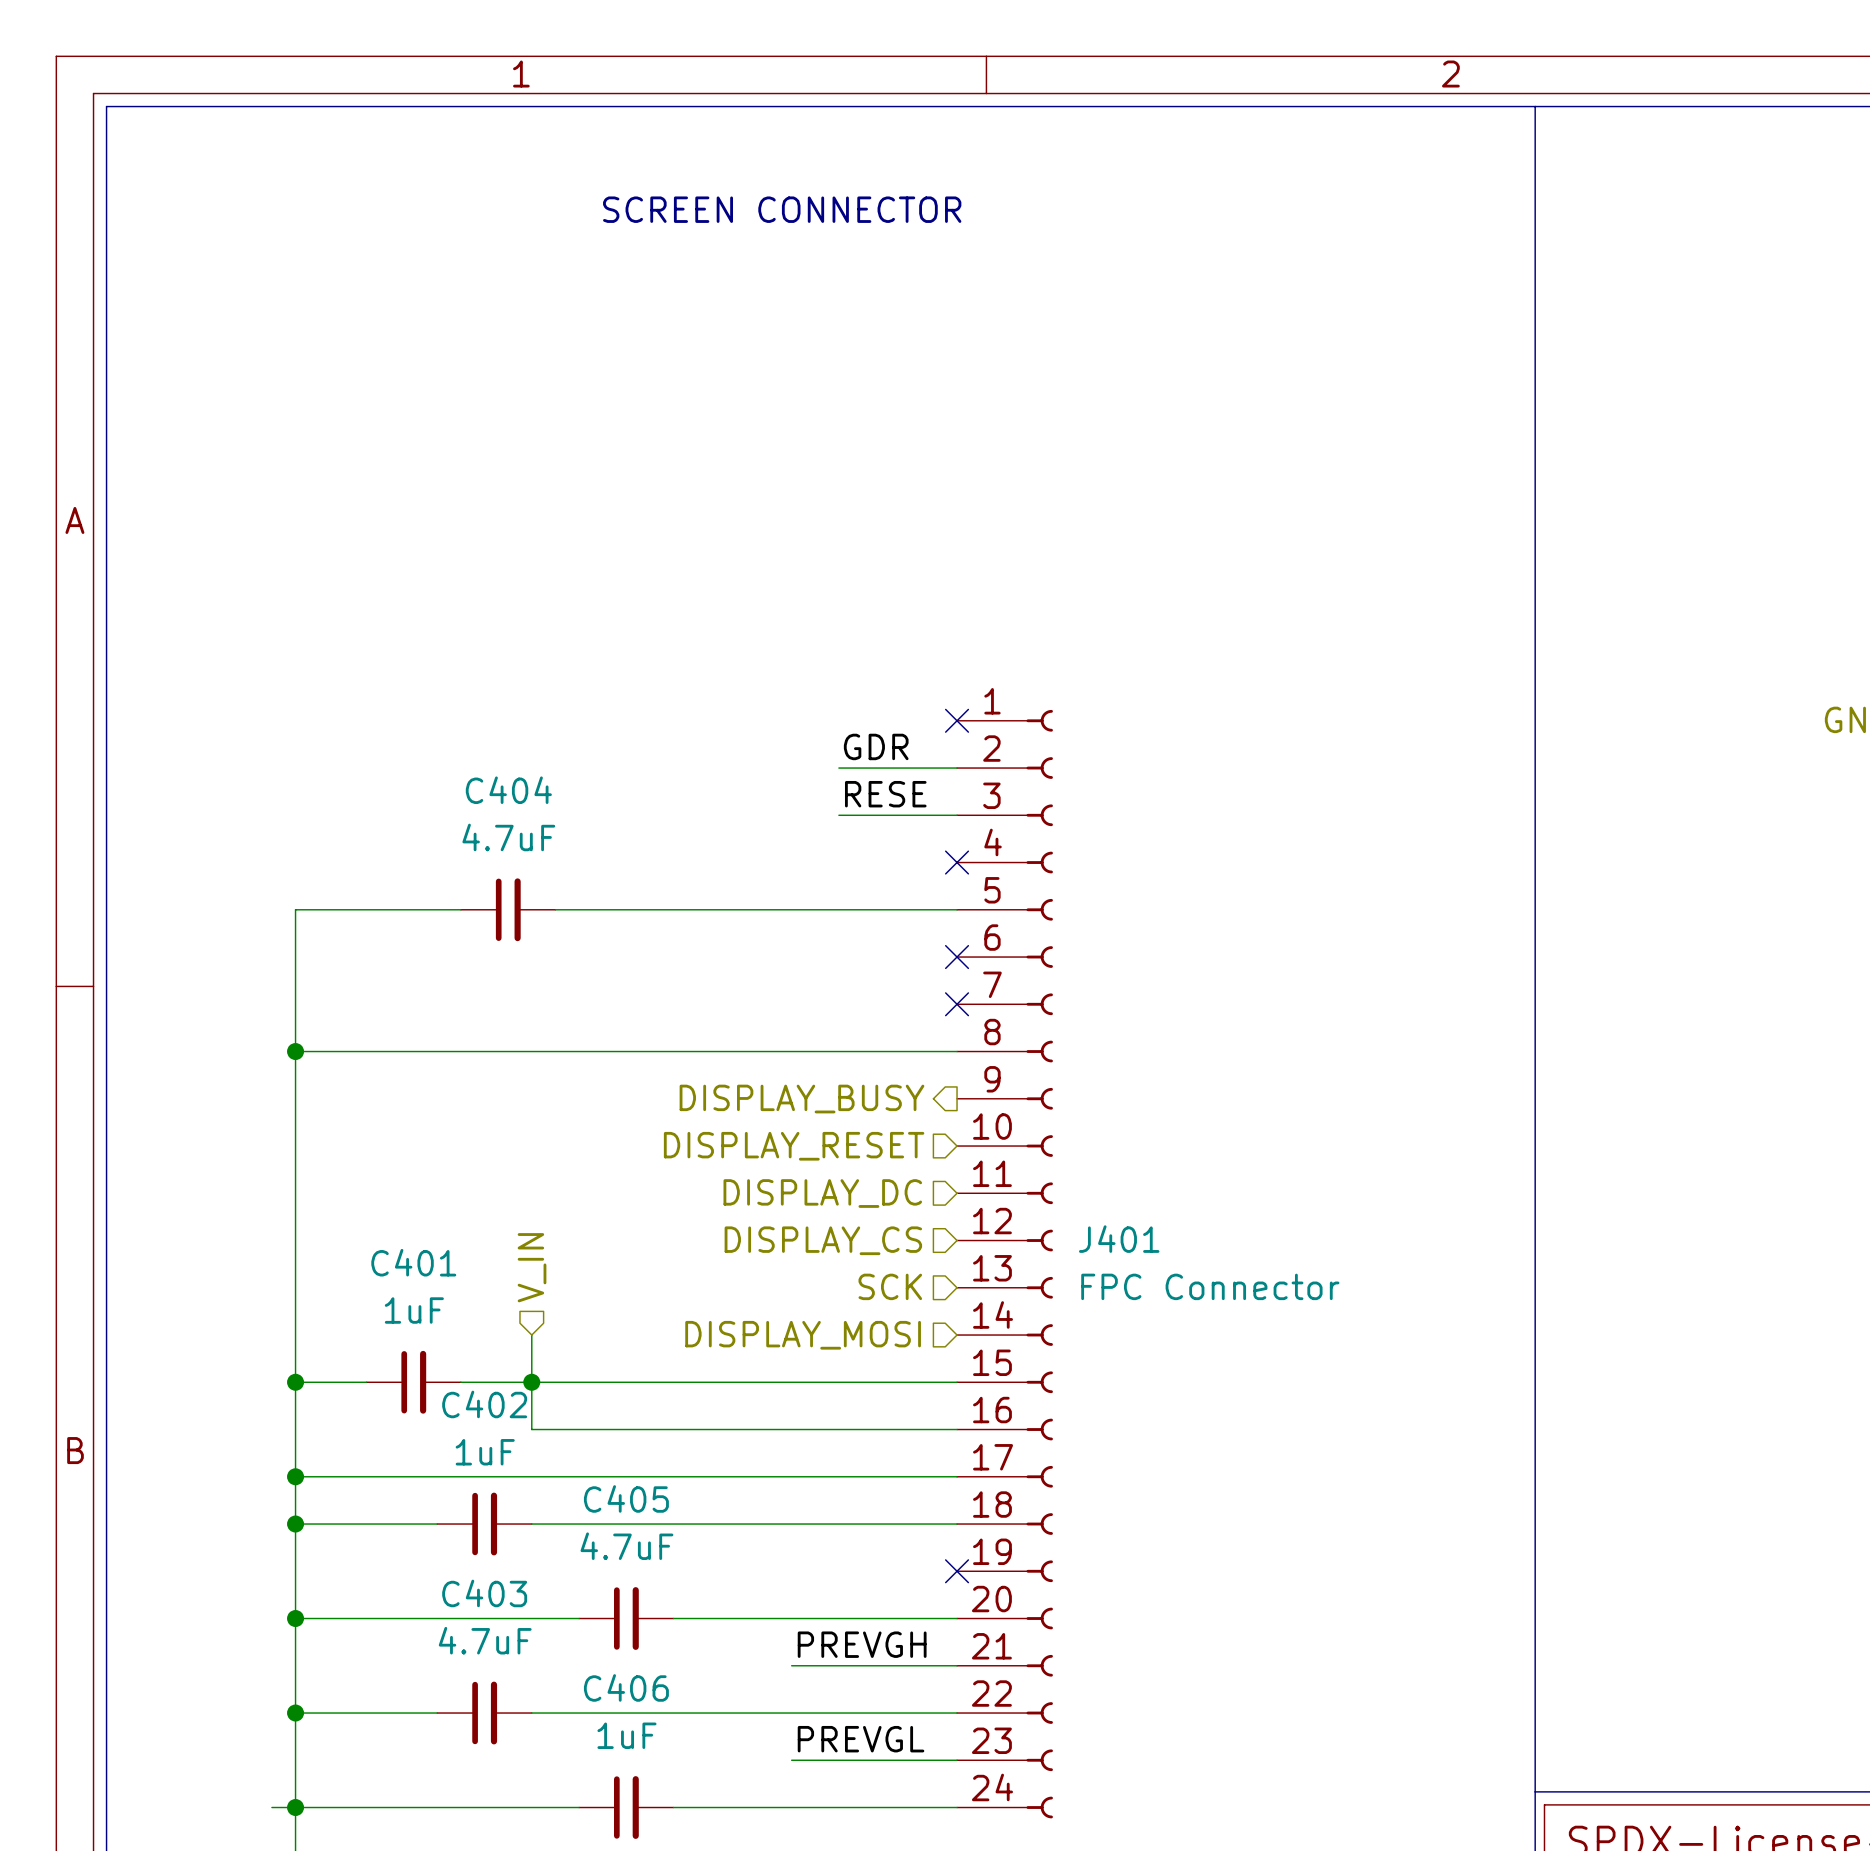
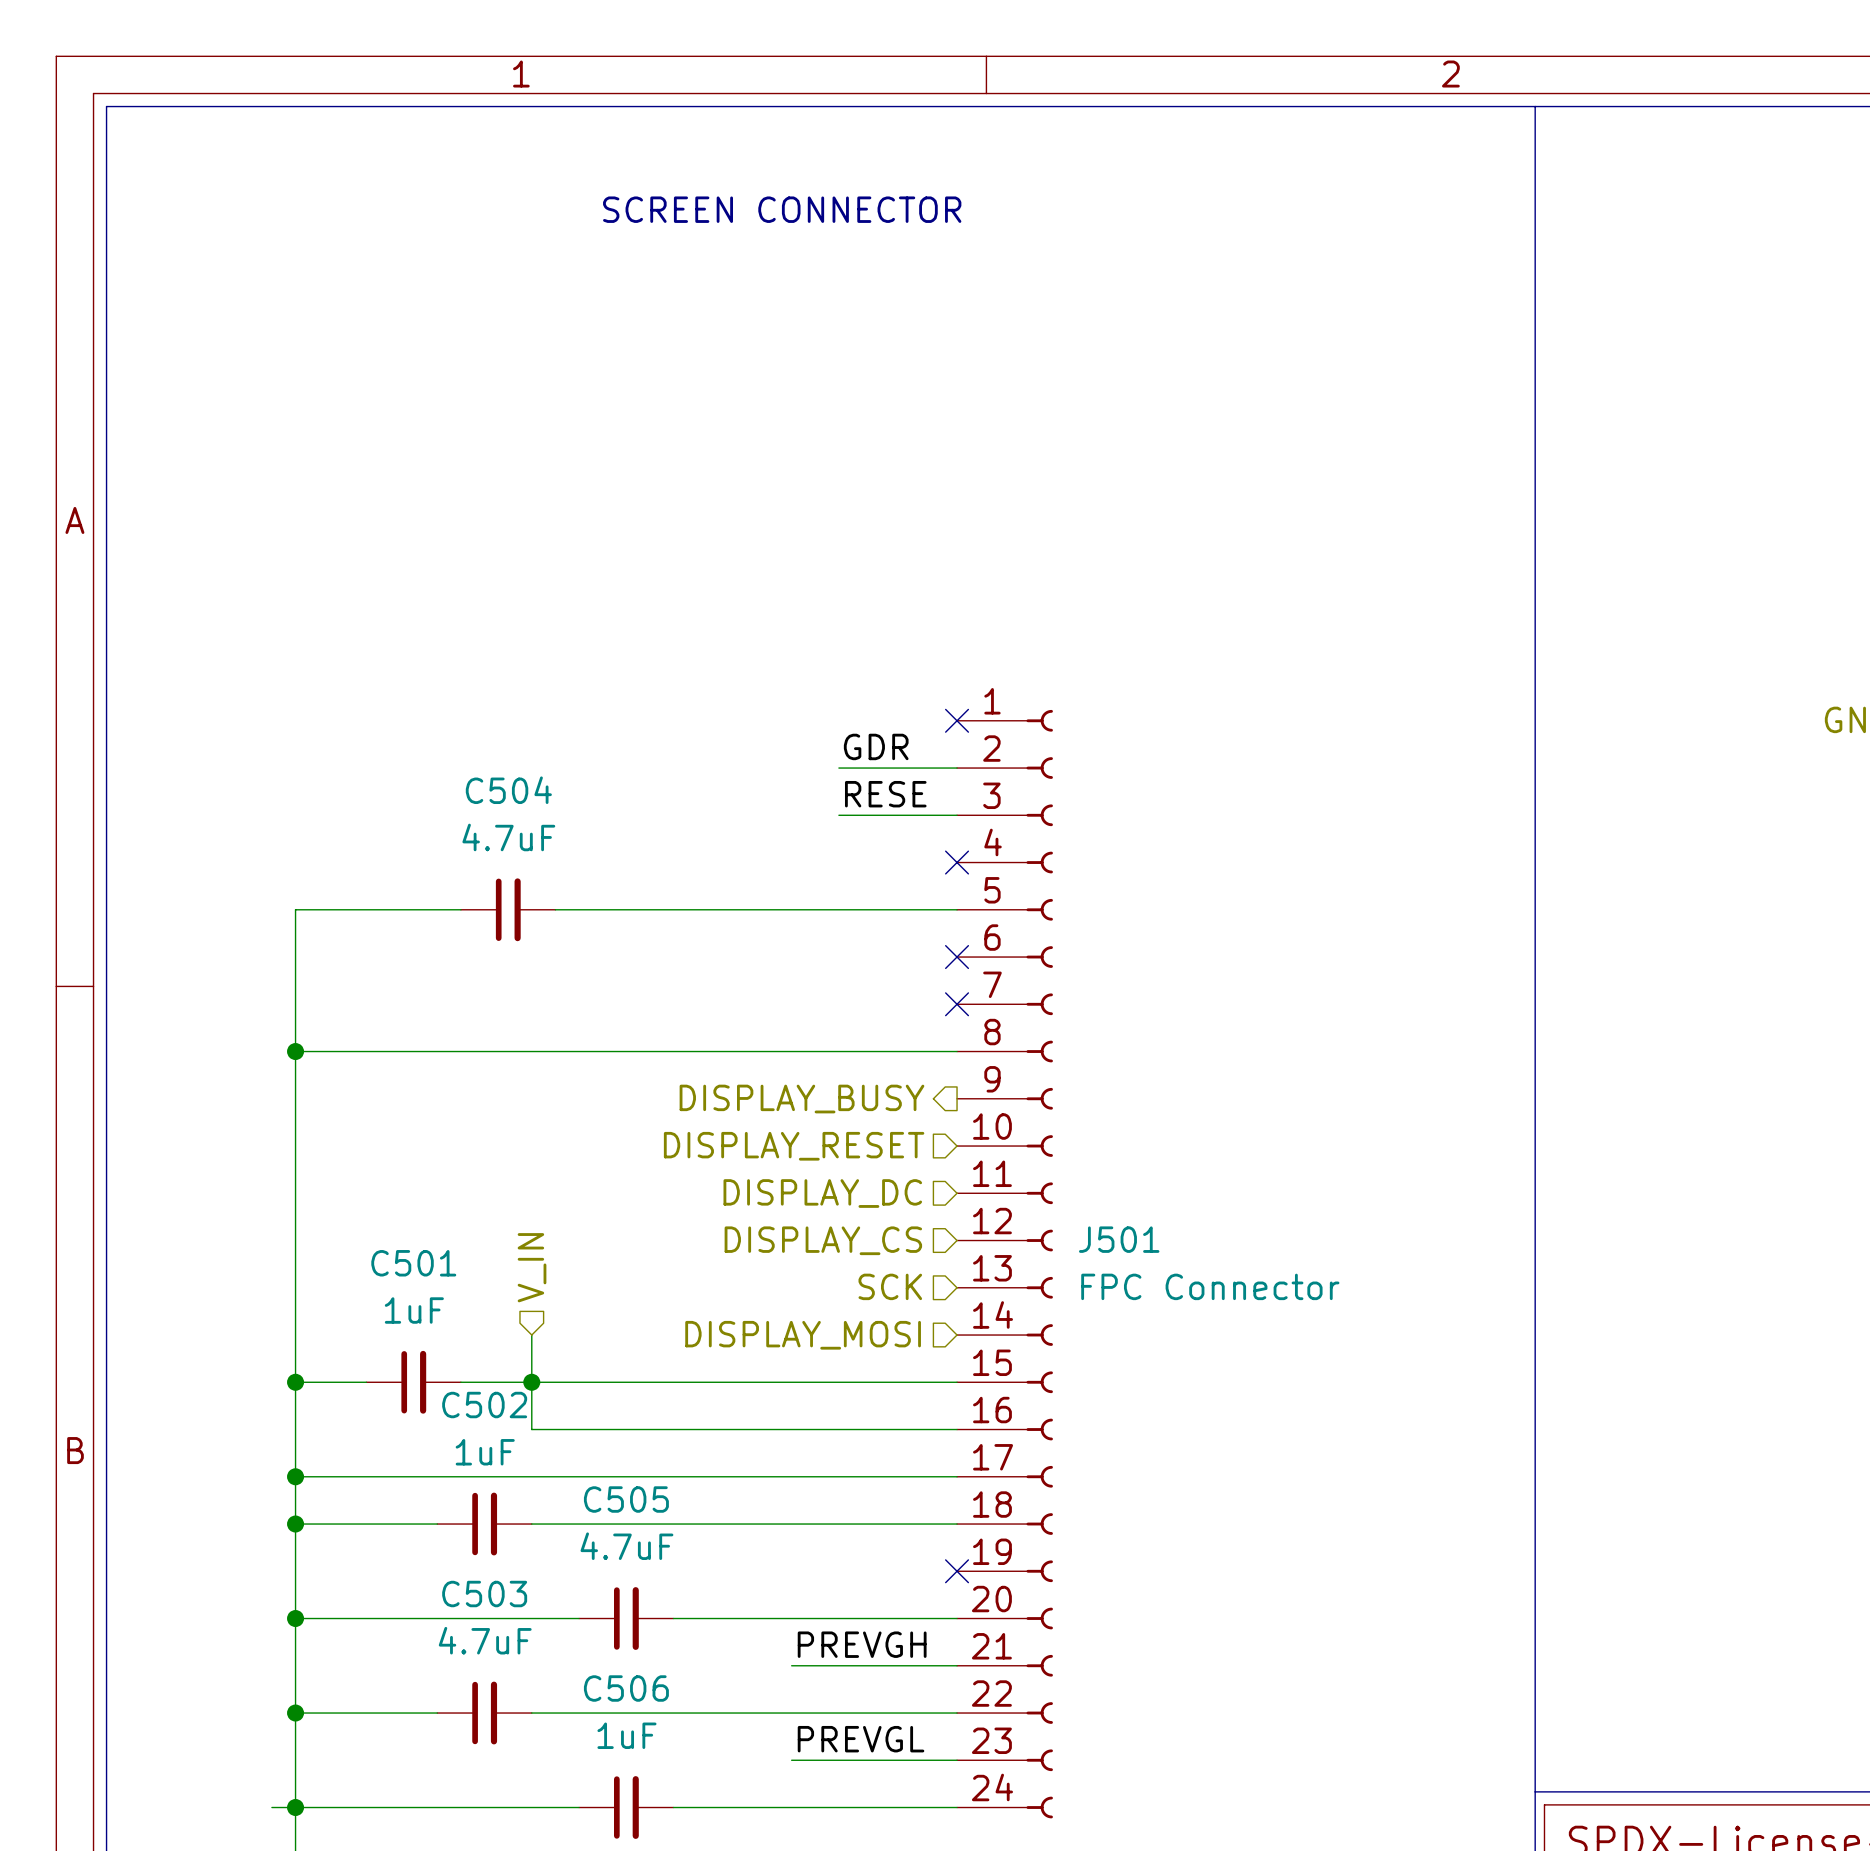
C404 name: C404 (508, 790) -> C504 (508, 790)
J401 name: J401 (1119, 1239) -> J501 (1119, 1239)
C401 name: C401 (413, 1262) -> C501 (413, 1263)
C402 name: C402 (484, 1404) -> C502 (484, 1405)
C405 name: C405 (626, 1498) -> C505 (626, 1499)
C403 name: C403 (484, 1593) -> C503 (484, 1594)
C406 name: C406 (626, 1687) -> C506 (626, 1688)

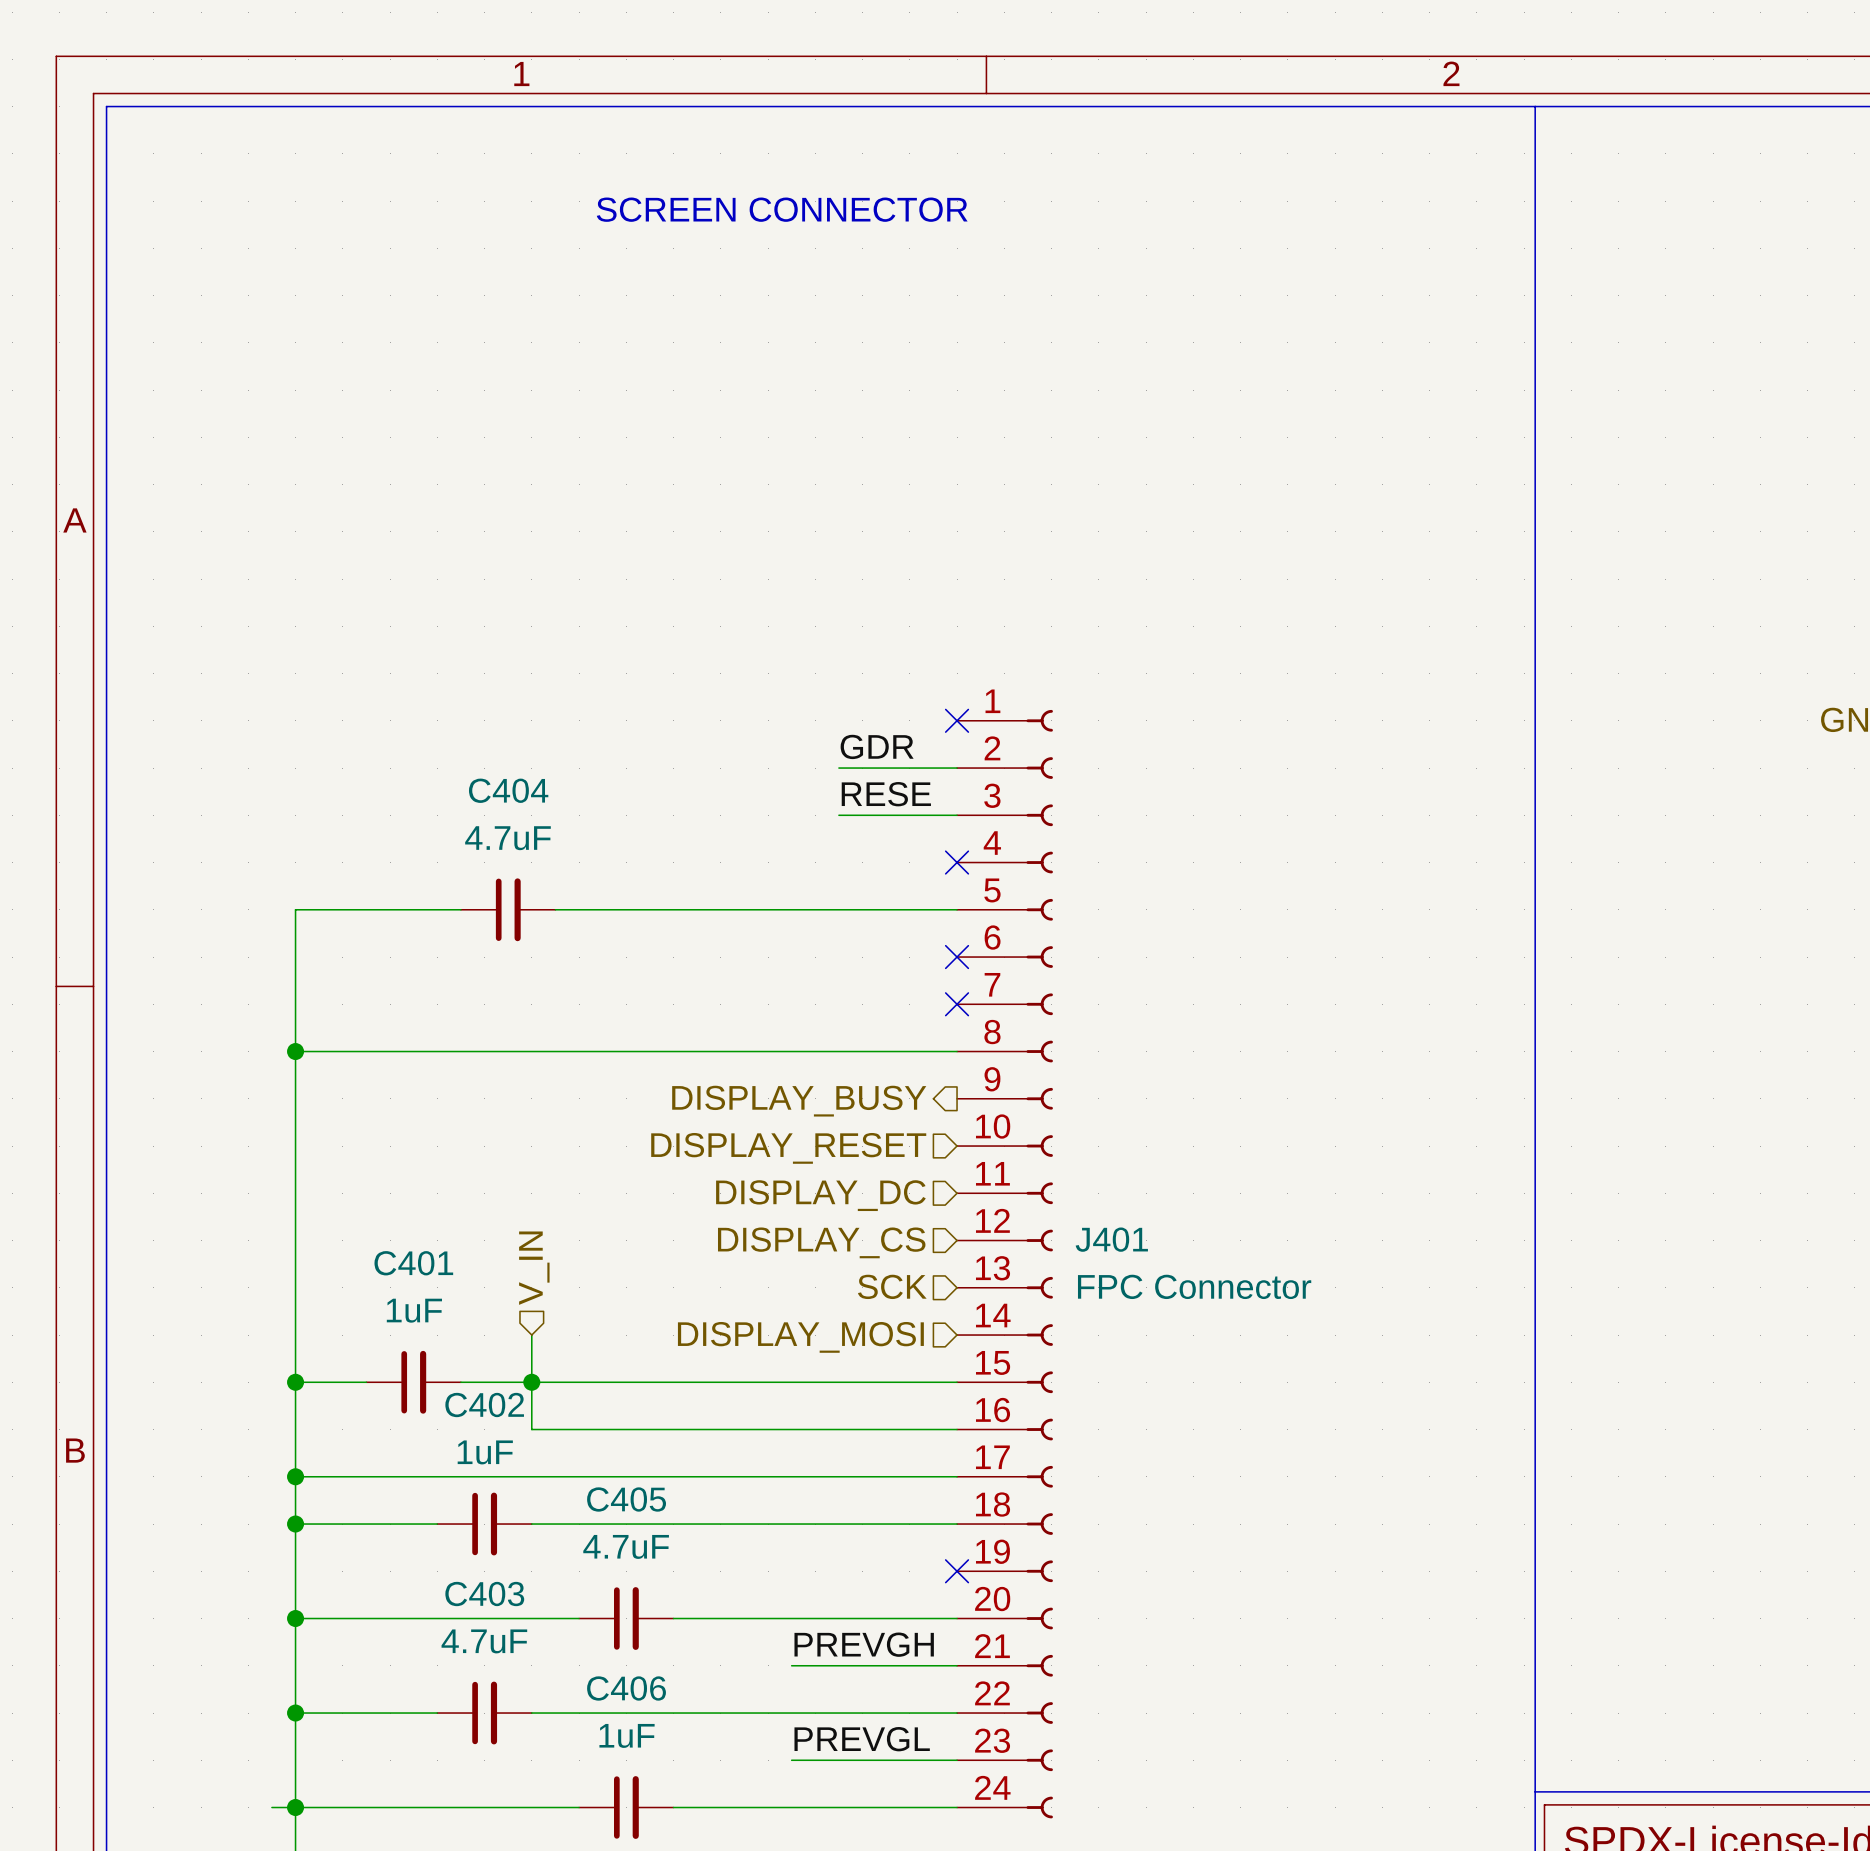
C504 name: C504 (508, 790) -> C404 (508, 790)
J501 name: J501 (1119, 1239) -> J401 (1111, 1239)
C501 name: C501 (413, 1263) -> C401 (413, 1263)
C502 name: C502 (484, 1405) -> C402 (484, 1405)
C505 name: C505 (626, 1499) -> C405 (626, 1499)
C503 name: C503 (484, 1594) -> C403 (484, 1594)
C506 name: C506 (626, 1688) -> C406 (626, 1688)

